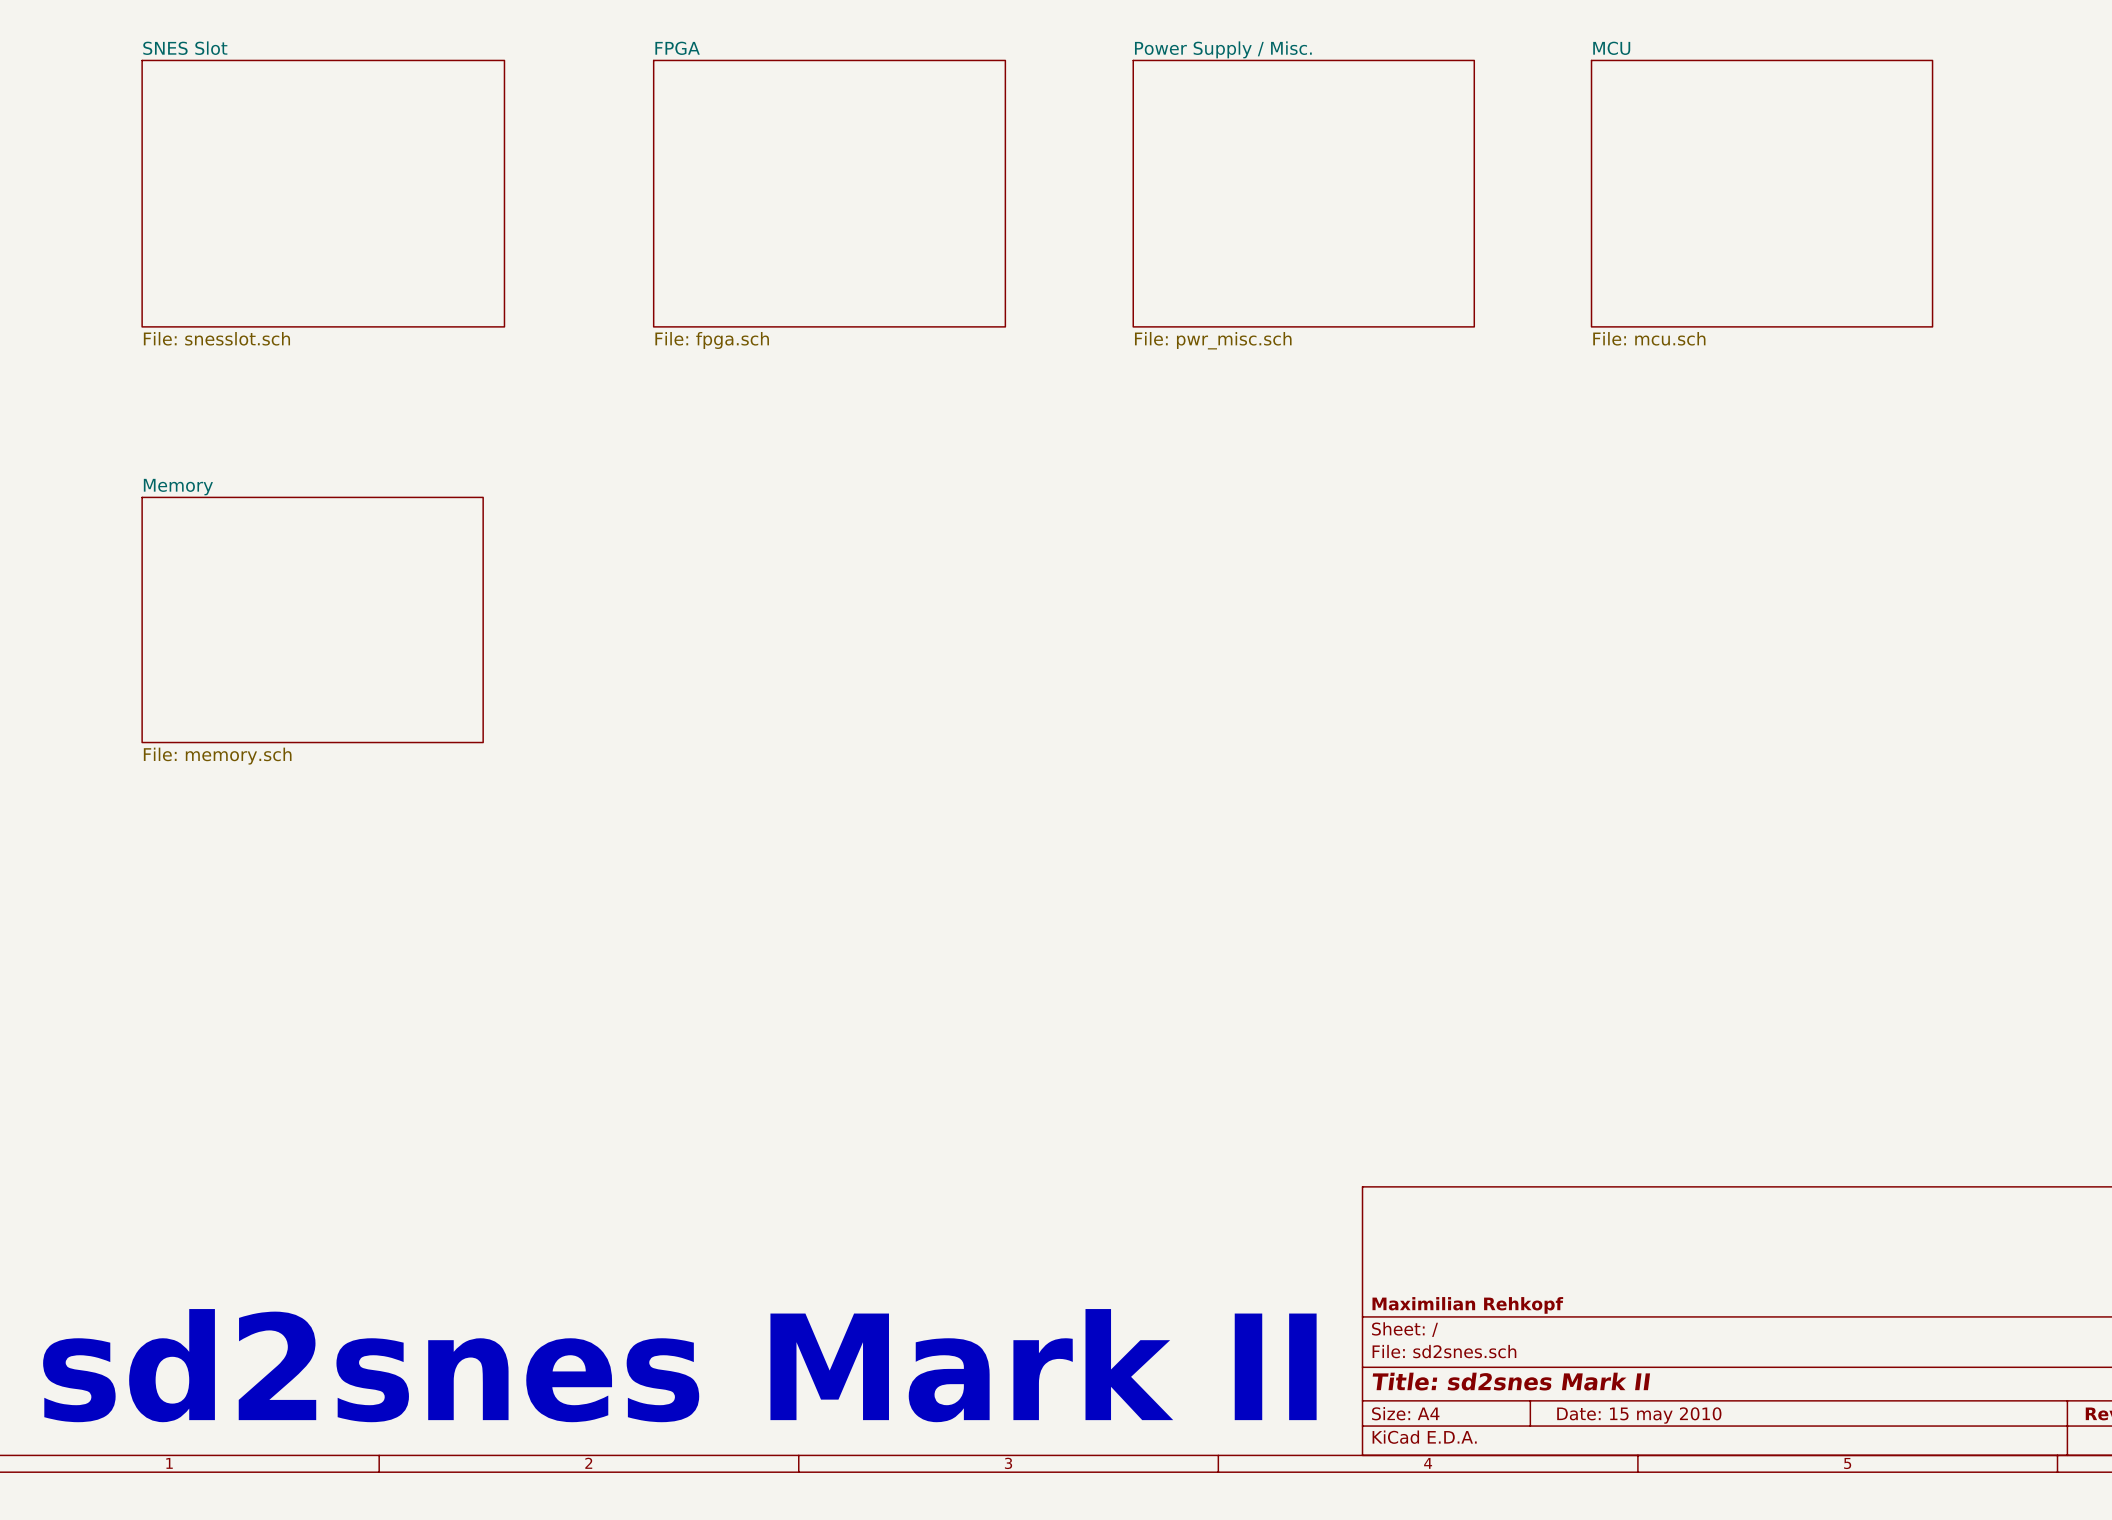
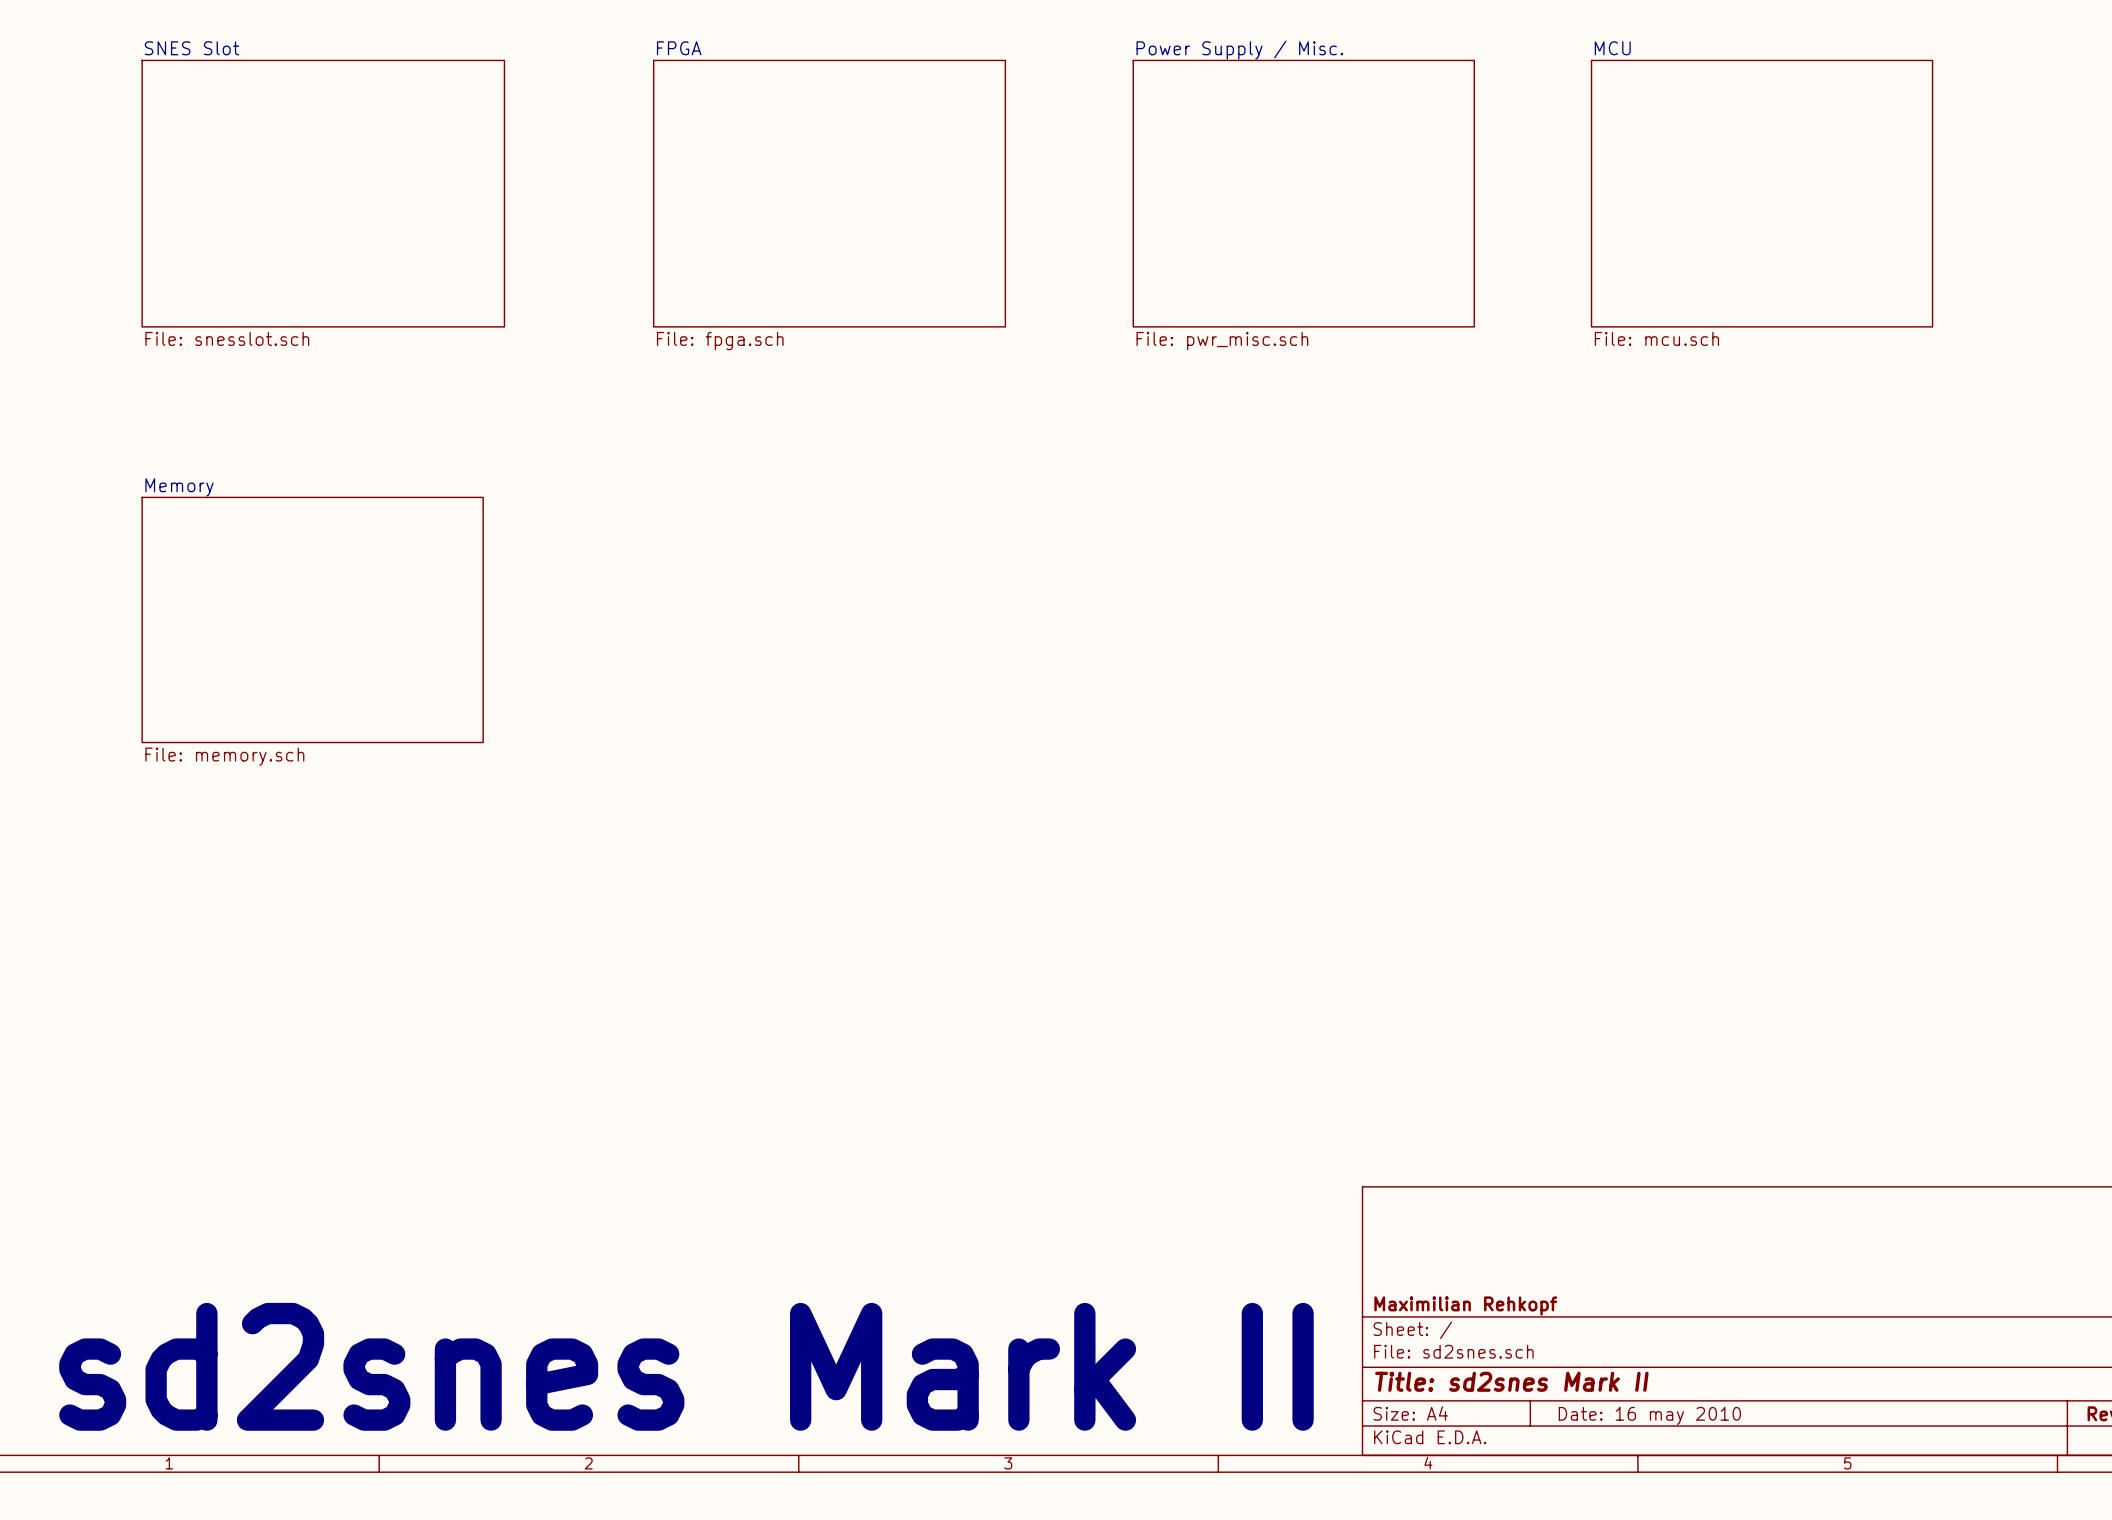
title block: Date: 15 may 2010 (1639, 1415) -> Date: 16 may 2010 (1649, 1415)

